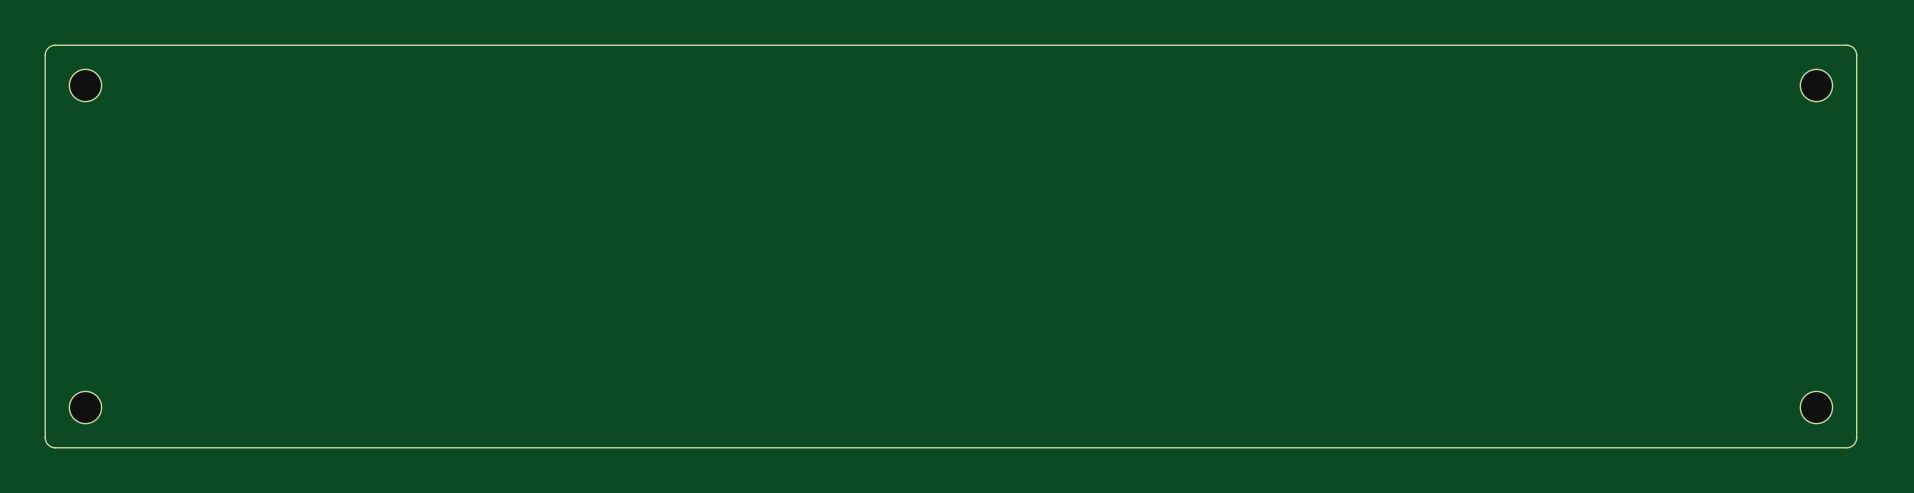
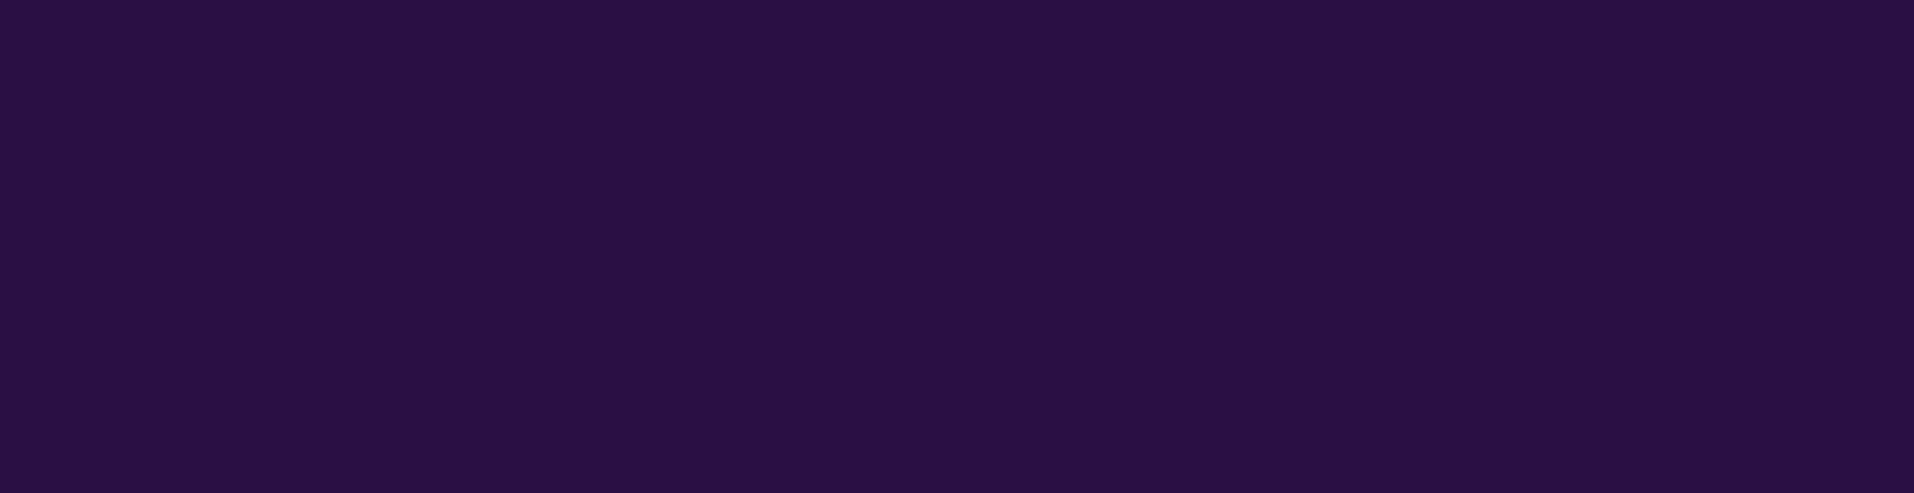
board edge: (1846, 45) (53, 45) (47, 49) (45, 55) (45, 439) (49, 445) (55, 447) (1848, 447) (1854, 443) (1856, 437) (1856, 55) (1853, 48) (1846, 45) -> none
part: (85, 85) -> none
part: (1816, 85) -> none
part: (85, 407) -> none
part: (1816, 407) -> none

